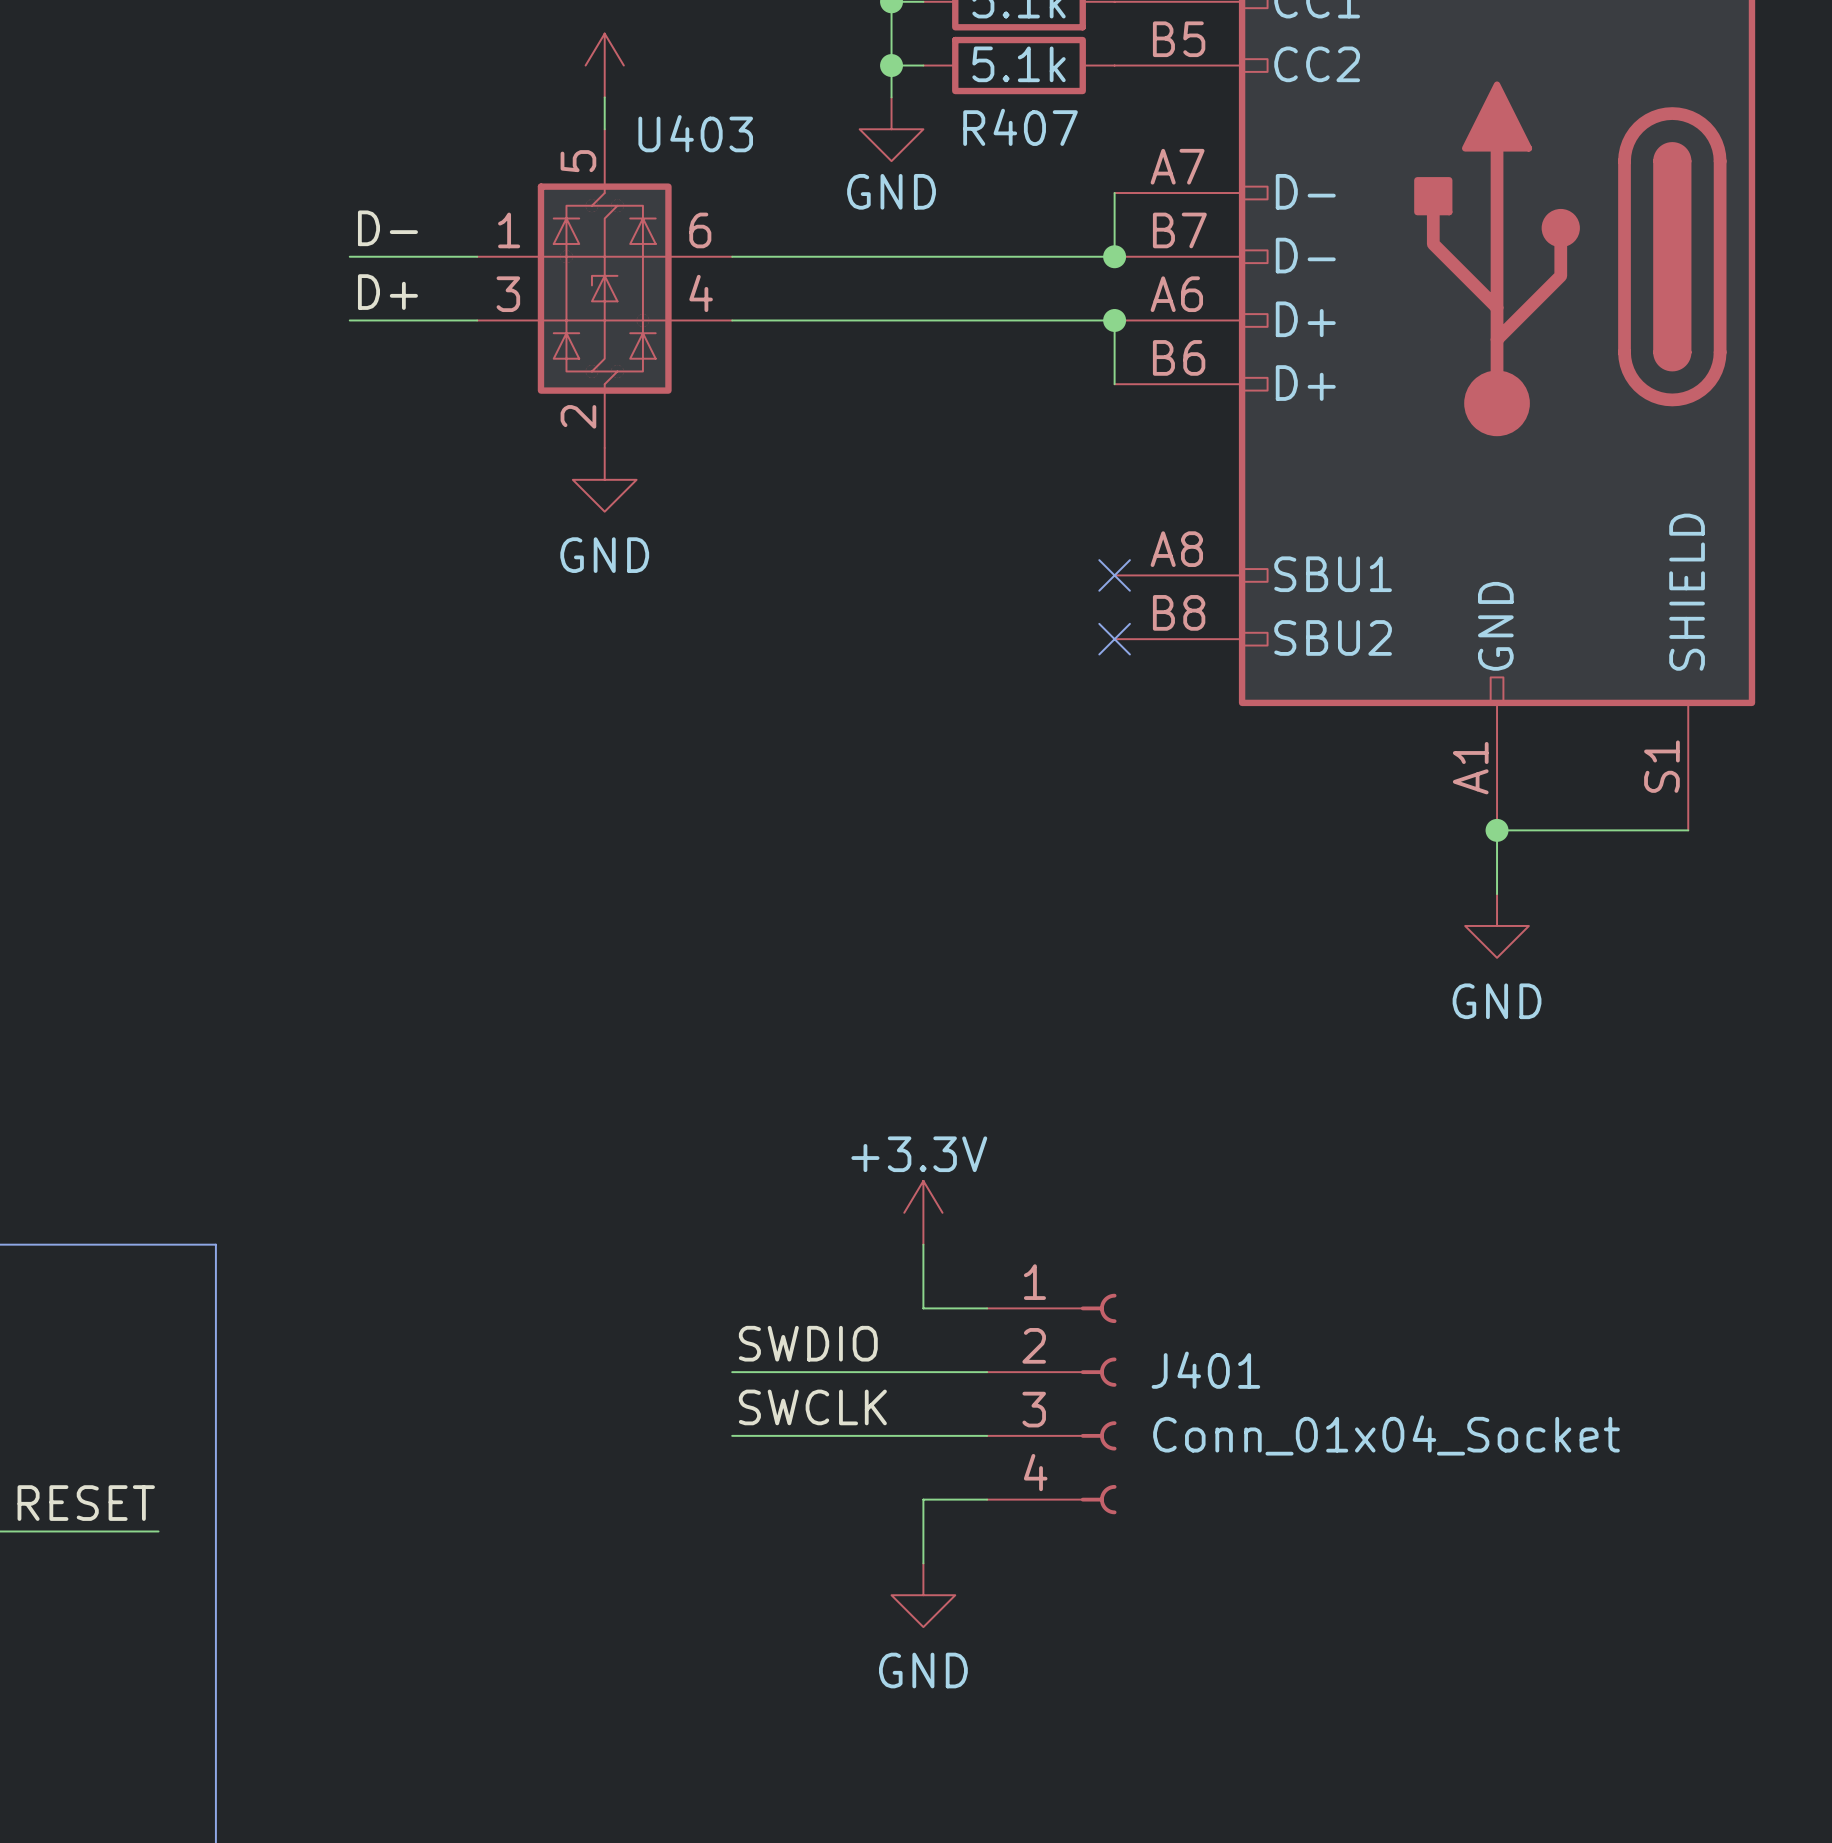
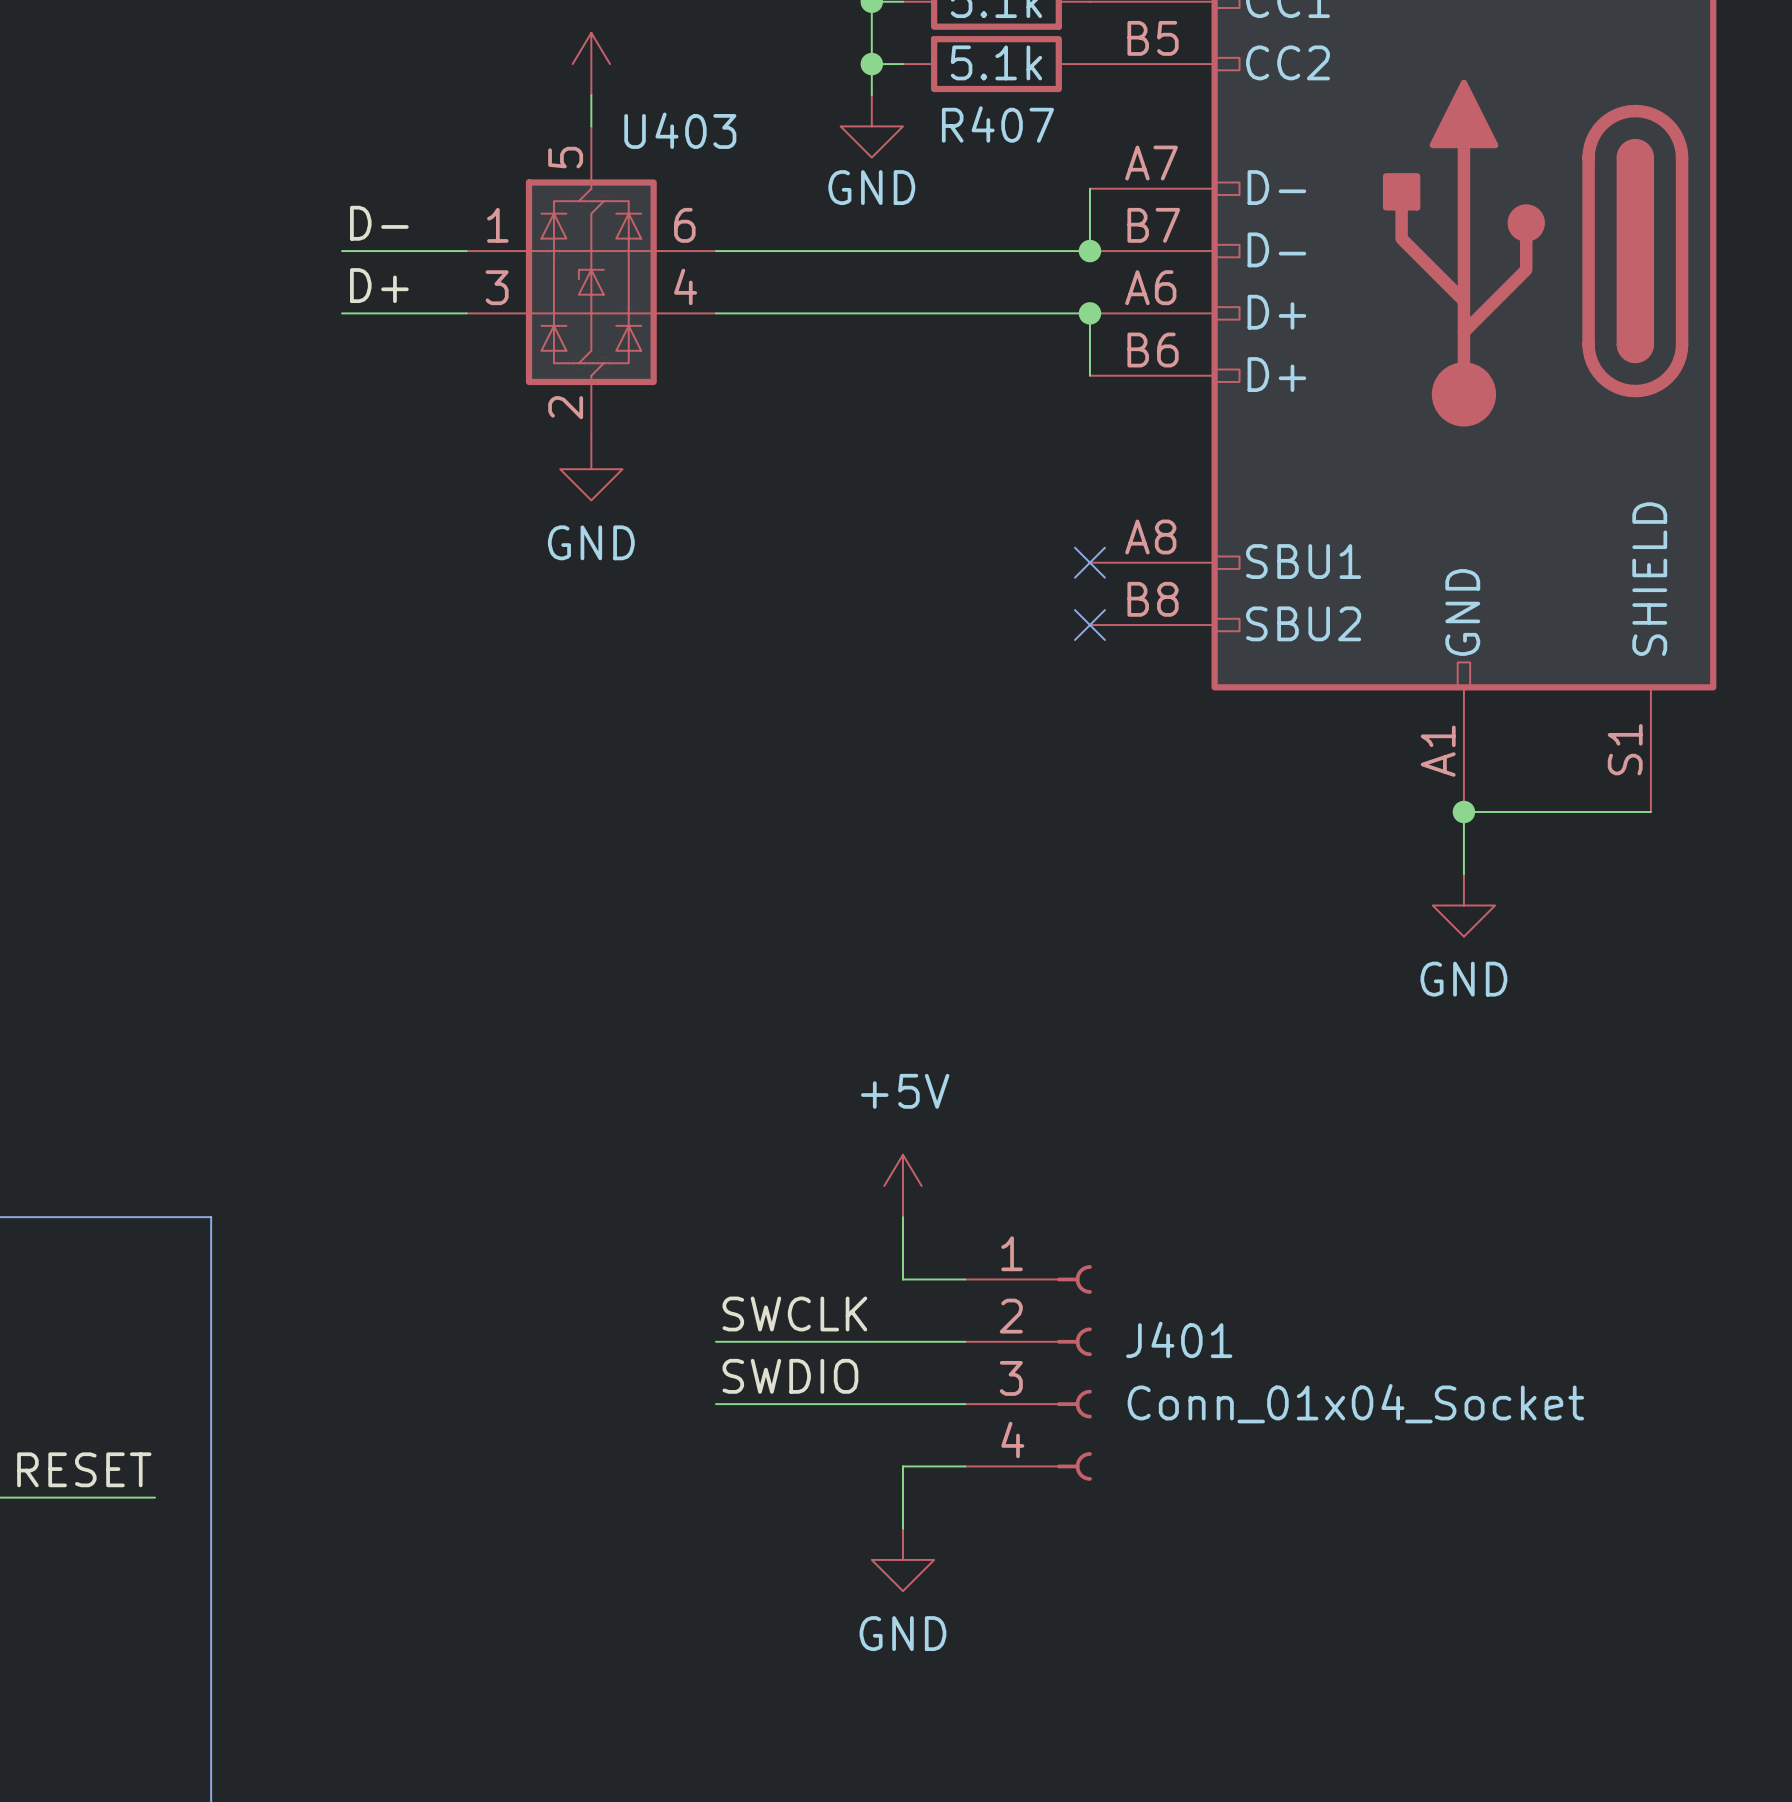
power symbol: +3.3V (923, 1212) -> +5V (902, 1185)
label: SWDIO (808, 1343) -> SWCLK (794, 1313)
label: SWCLK (812, 1407) -> SWDIO (790, 1376)

